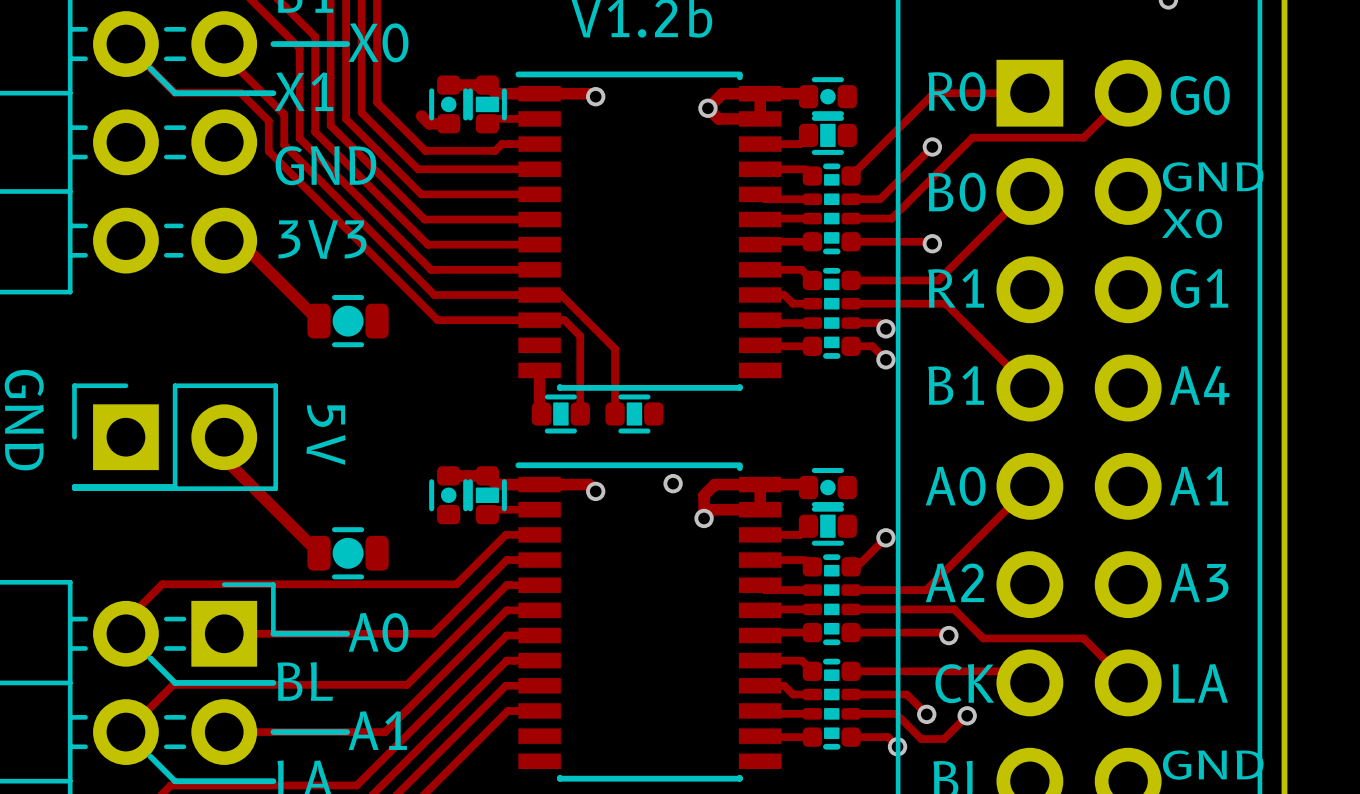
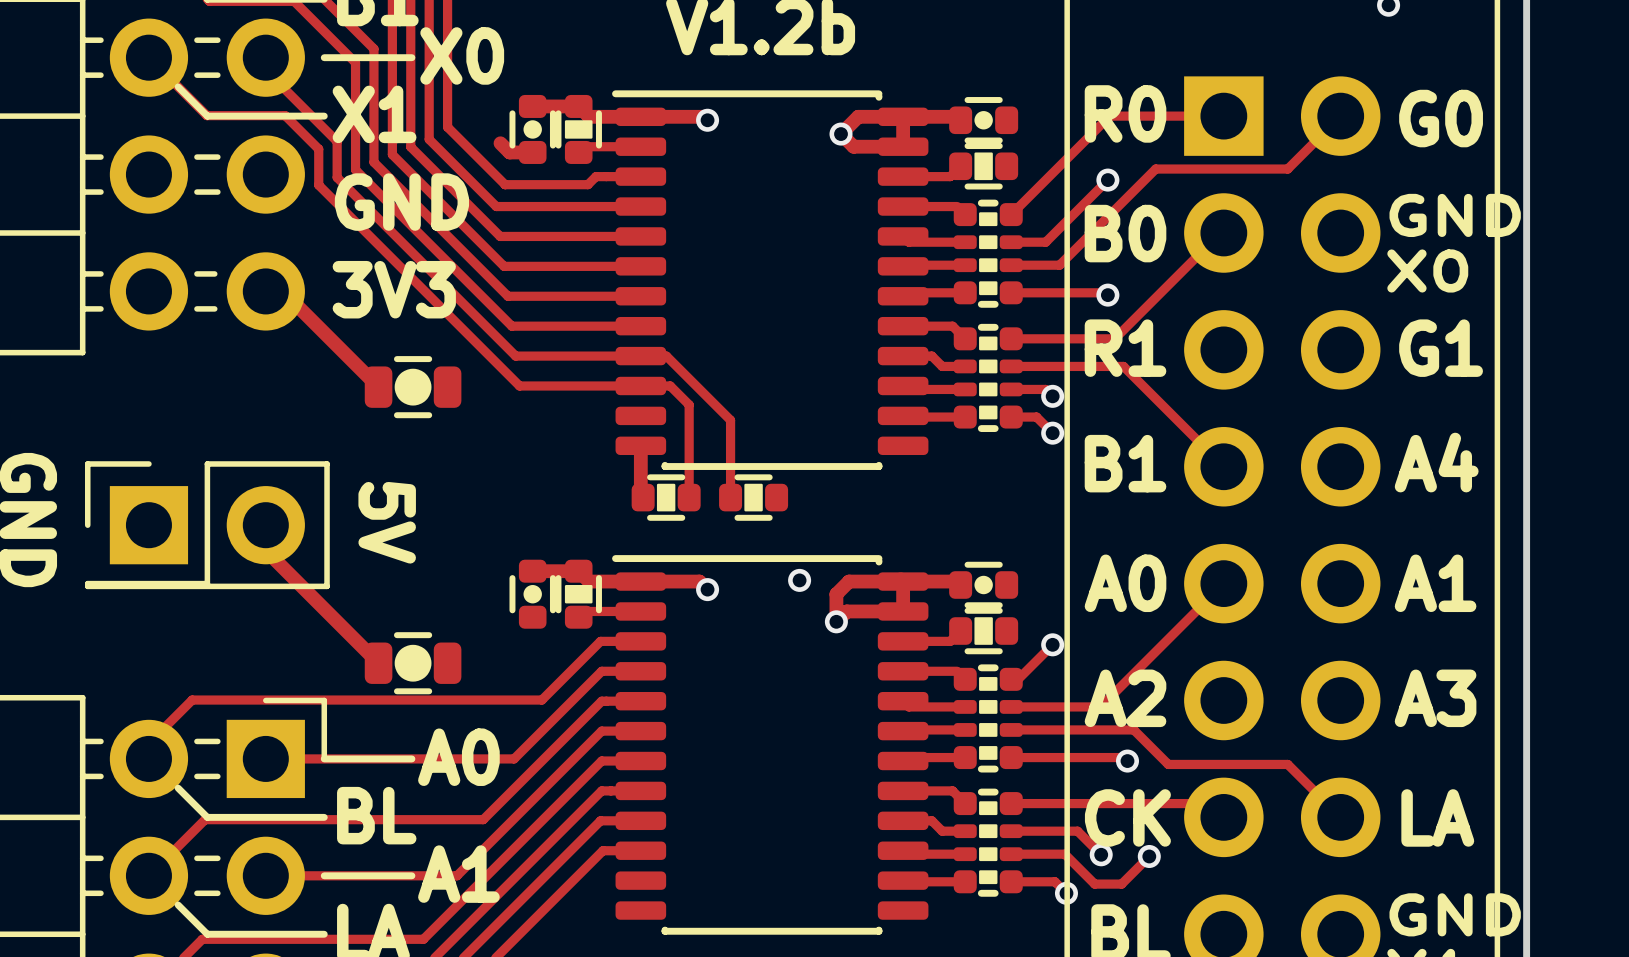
part footprint: [515, 71, 782, 391] -> [612, 90, 929, 470]
part footprint: [515, 462, 782, 782] -> [612, 555, 929, 935]

